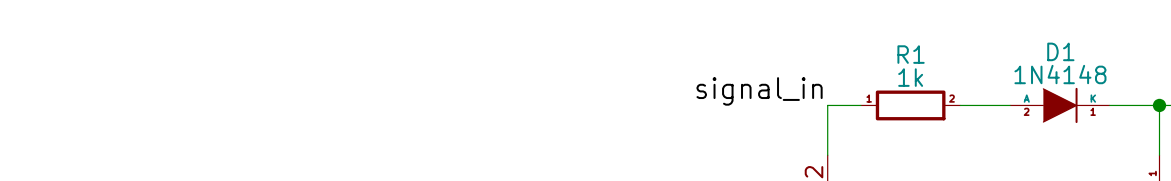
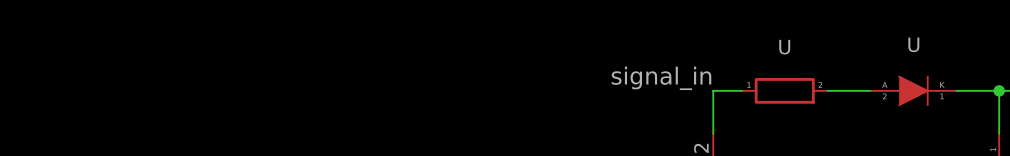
D1 name: D1 (1060, 51) -> U (913, 44)
R1 name: R1 (911, 54) -> U (784, 47)
D1 value: 1N4148 (1060, 74) -> none
R1 value: 1k (910, 77) -> none

